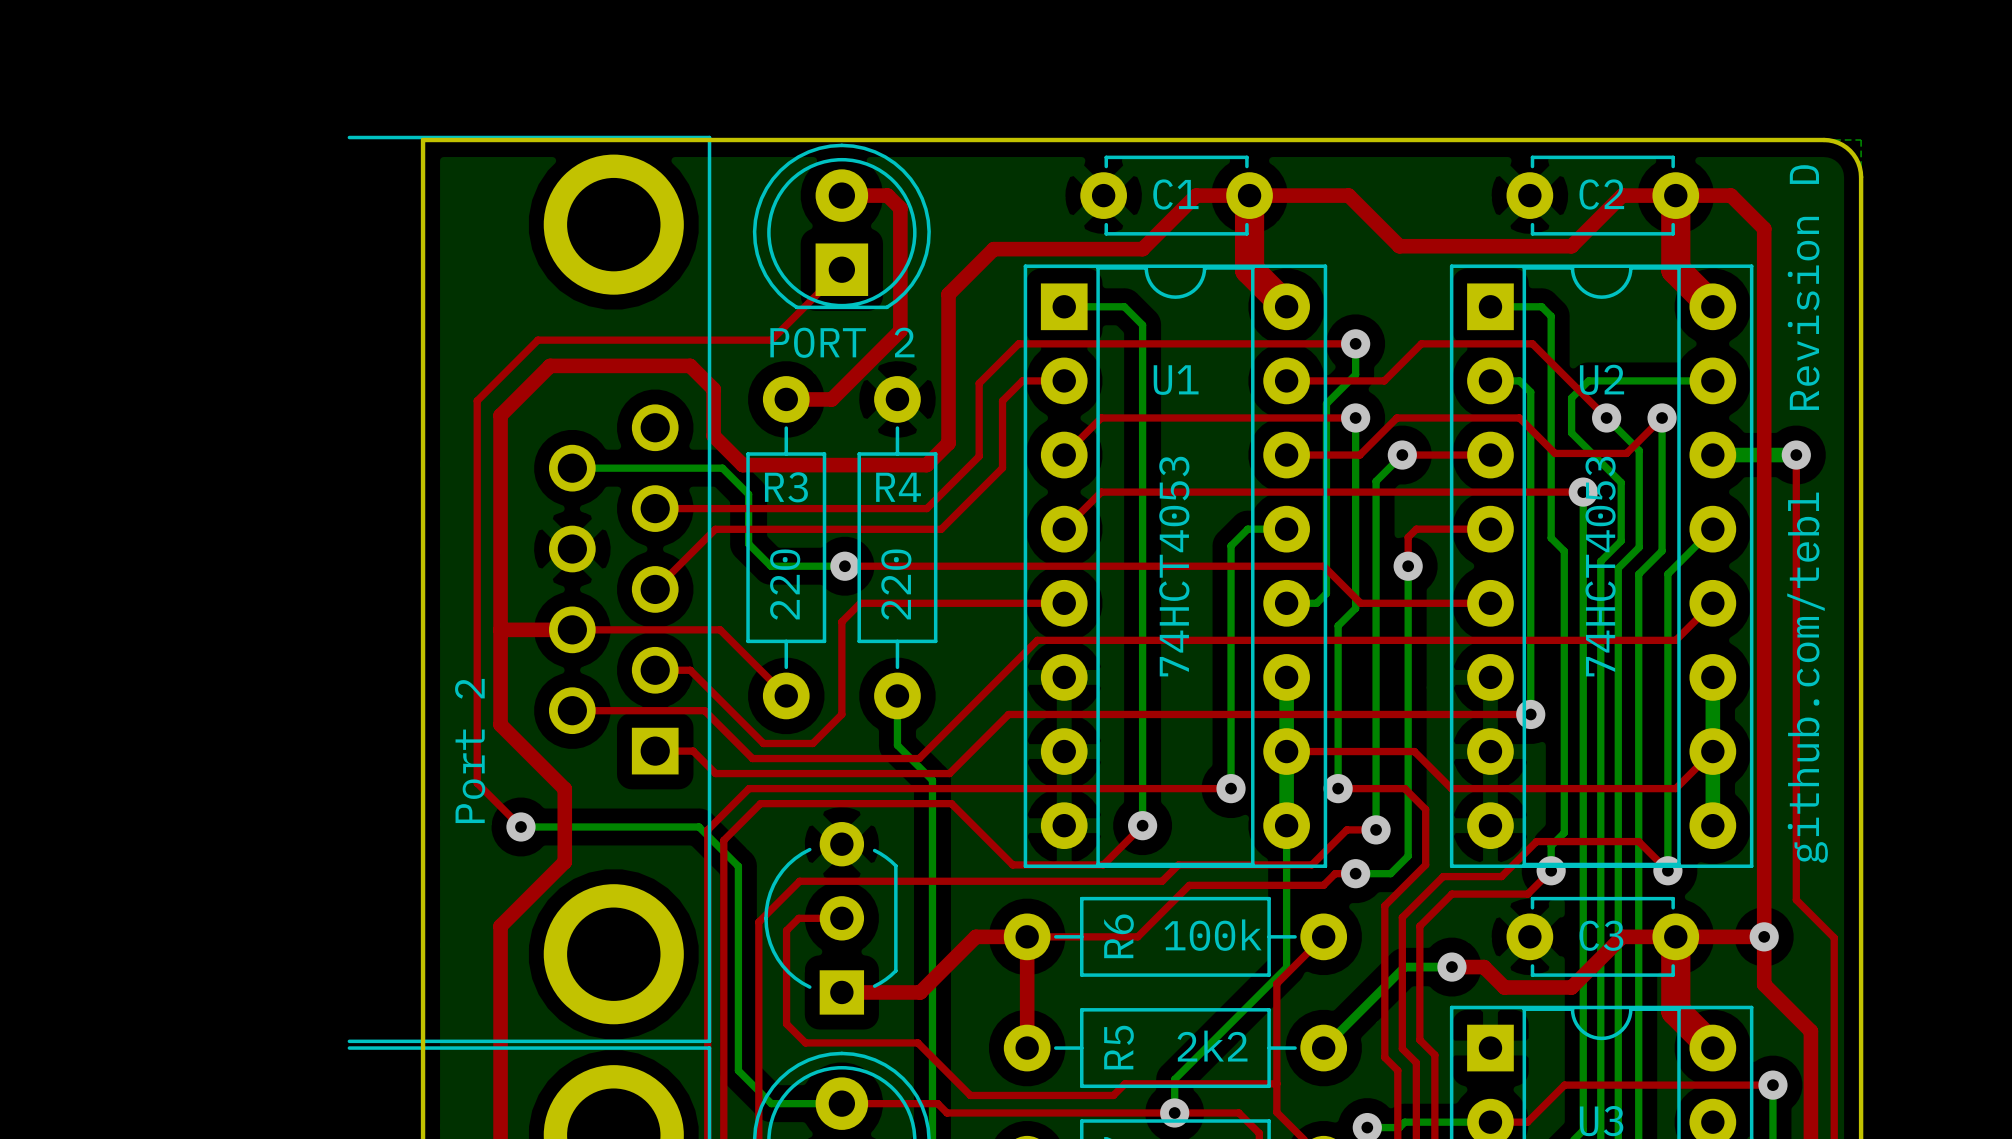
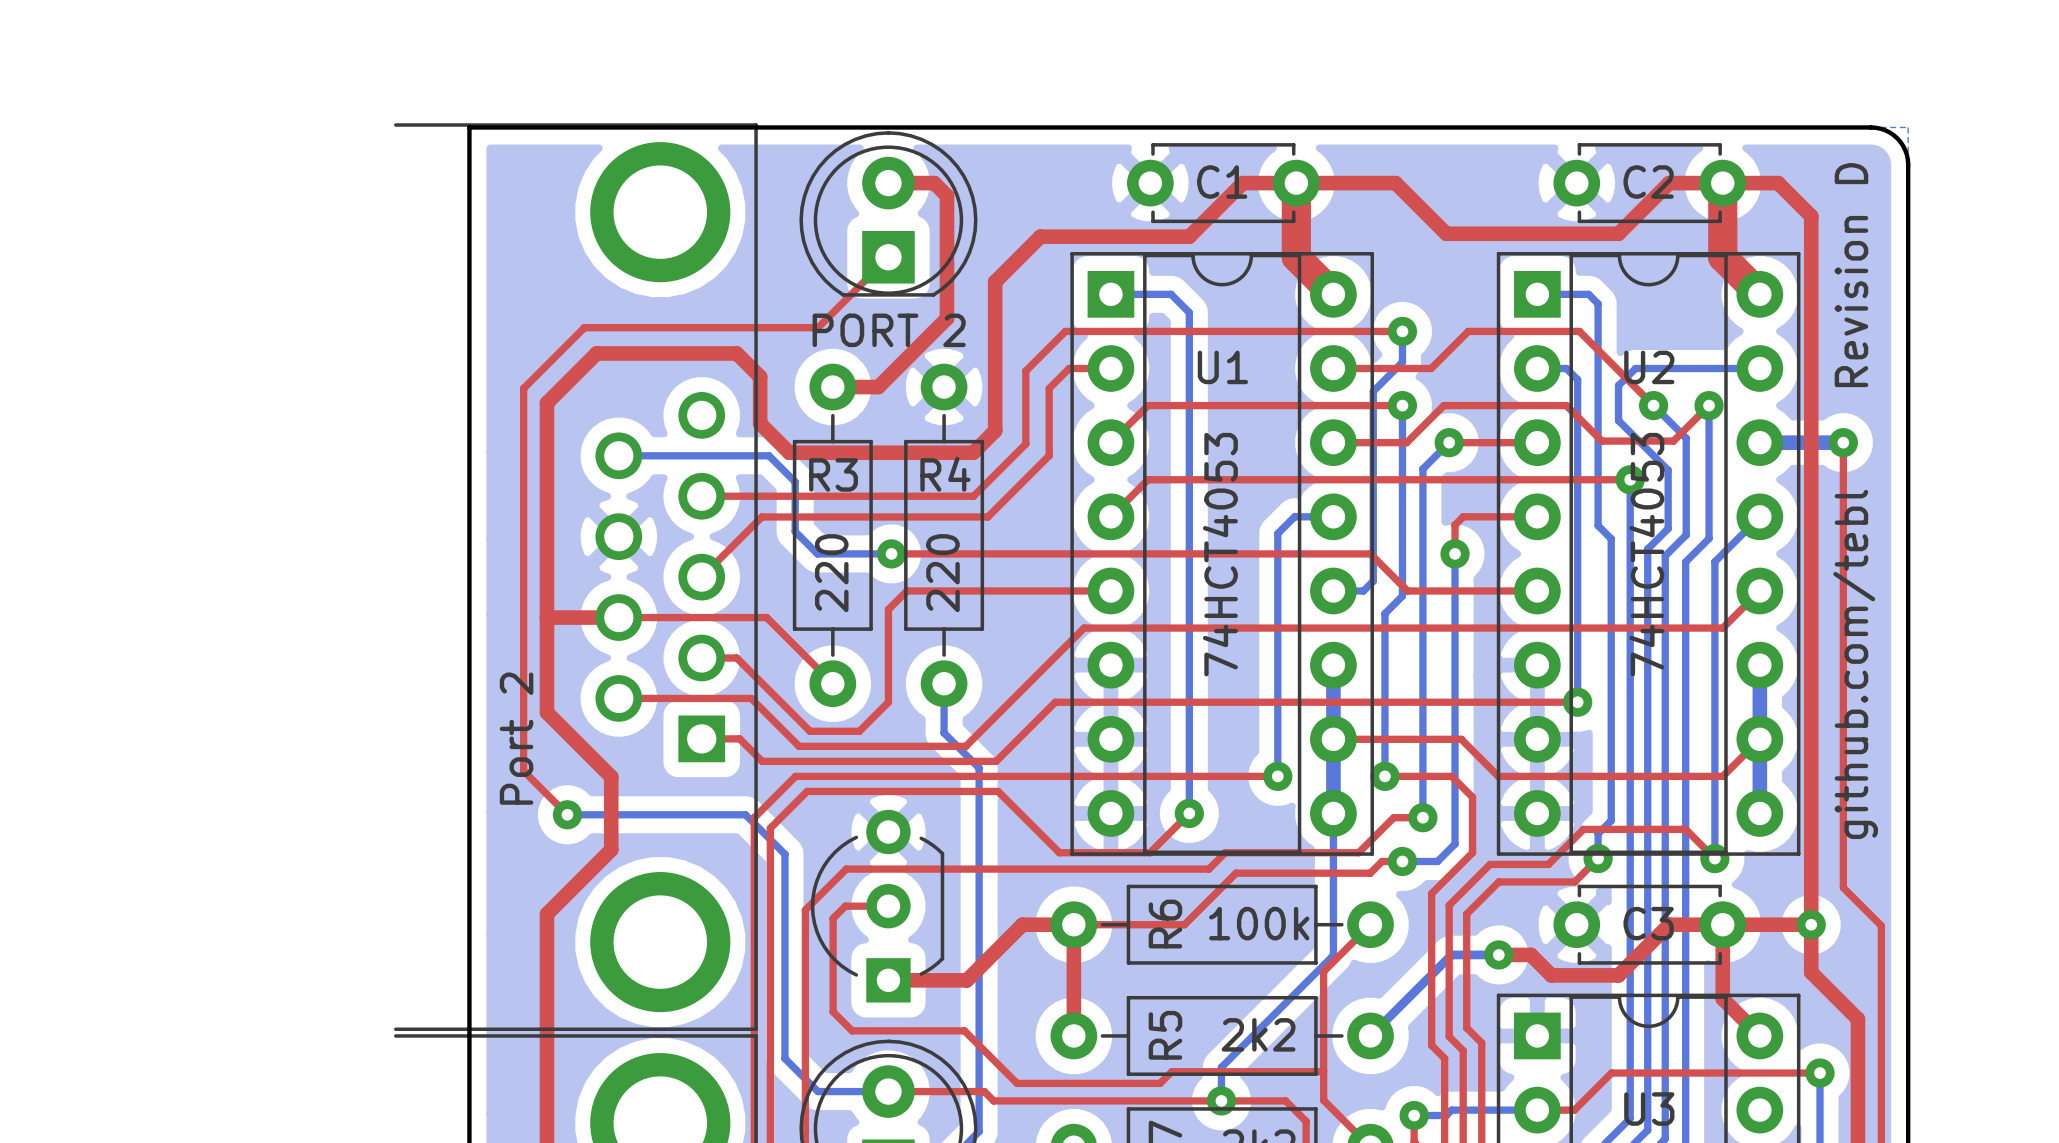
top track width: thick (1675, 936) (1675, 1010) (1712, 1048) -> thin (1722, 924) (1722, 998) (1759, 1035)

